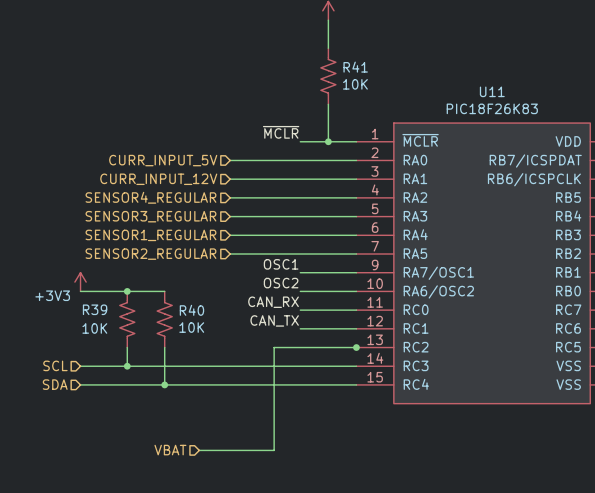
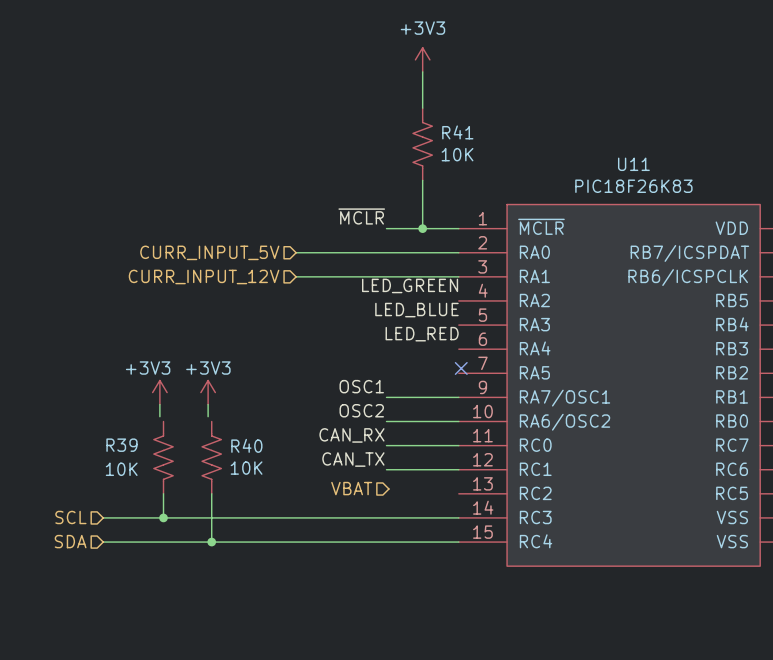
label: none -> LED_GREEN (410, 285)
hierarchical label: SENSOR4_REGULAR (150, 197) -> none
wire: (230, 197) (356, 197) -> none
label: none -> LED_BLUE (416, 310)
hierarchical label: SENSOR3_REGULAR (150, 216) -> none
wire: (230, 216) (356, 216) -> none
label: none -> LED_RED (422, 334)
hierarchical label: SENSOR1_REGULAR (150, 235) -> none
wire: (230, 235) (356, 235) -> none
no-connect mark: none -> (461, 368)
hierarchical label: SENSOR2_REGULAR (150, 254) -> none
wire: (230, 254) (356, 254) -> none
power symbol: none -> +3V3 (159, 392)
power symbol: none -> +3V3 (208, 392)
wire: none -> (159, 404) (159, 416)
wire: none -> (208, 404) (208, 416)
power symbol: +3V3 (80, 282) -> none
wire: (80, 291) (164, 291) -> none
junction: (127, 291) -> none
junction: (356, 347) -> none
wire: (358, 347) (274, 347) (274, 450) (199, 450) -> none
hierarchical label position: VBAT (170, 450) -> VBAT (351, 488)

